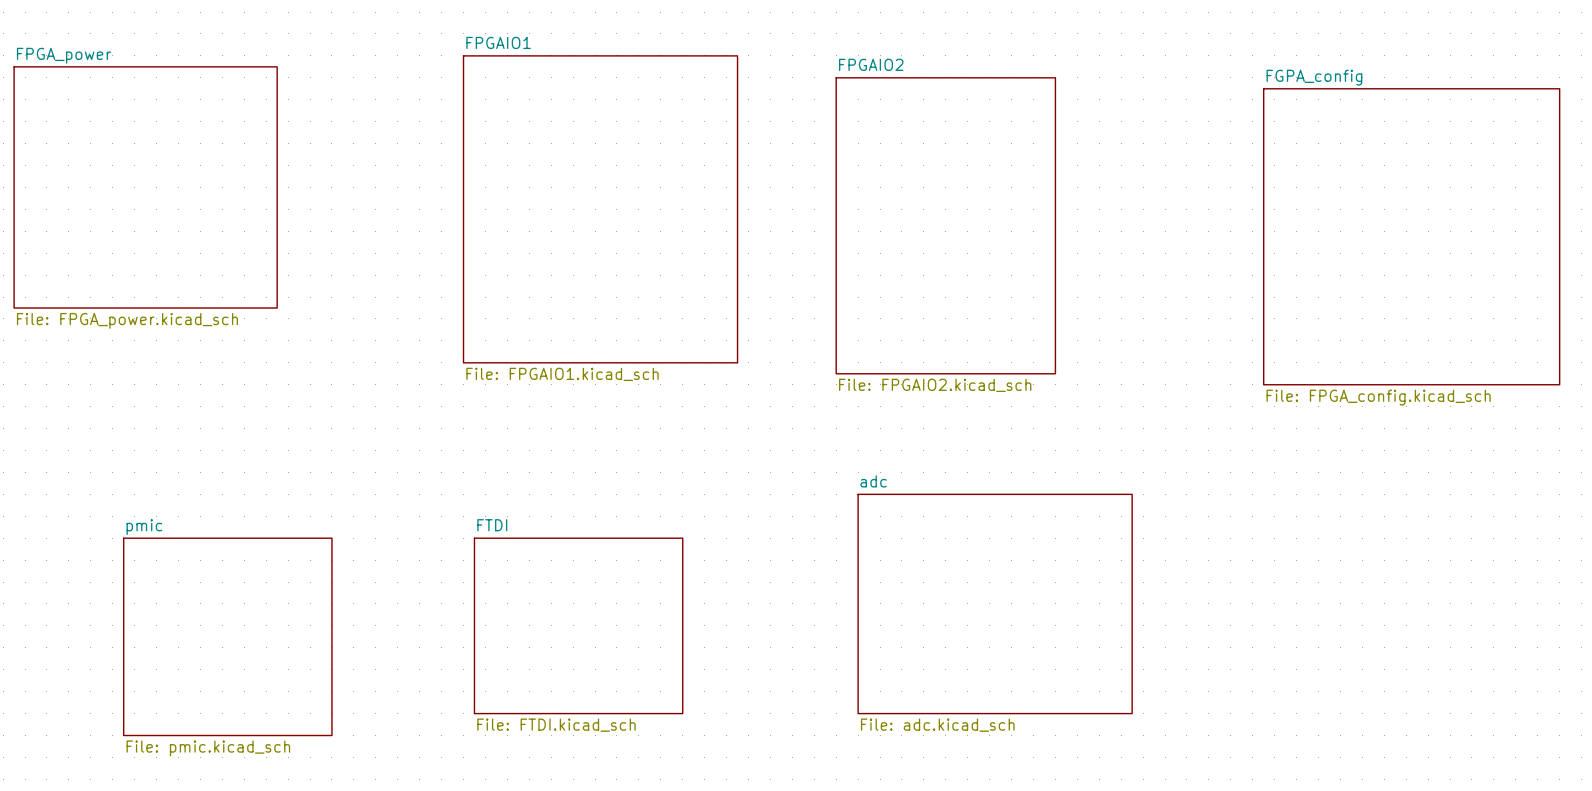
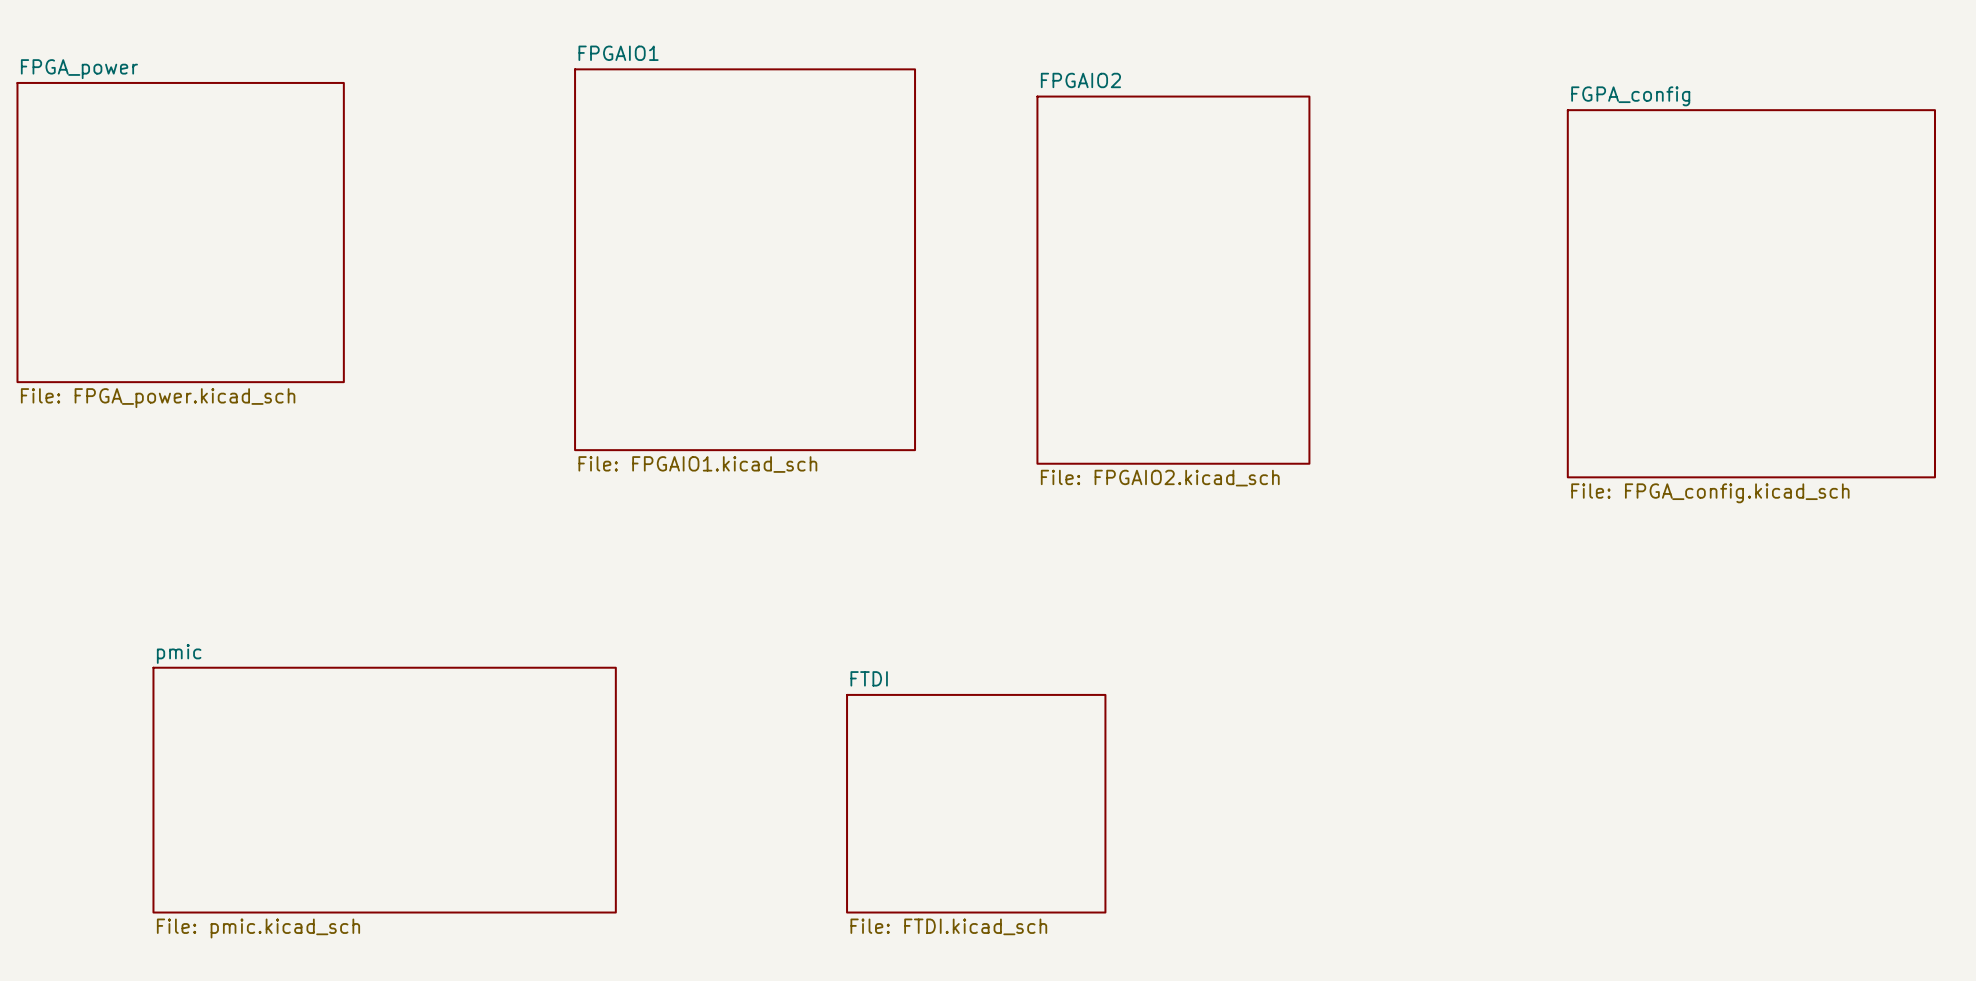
sheet adc: File: adc.kicad_sch (995, 603) -> none
sheet FTDI position: (578, 625) -> (976, 803)
sheet pmic: File: pmic.kicad_sch (227, 636) -> none
sheet pmic: none -> File: pmic.kicad_sch (384, 790)

